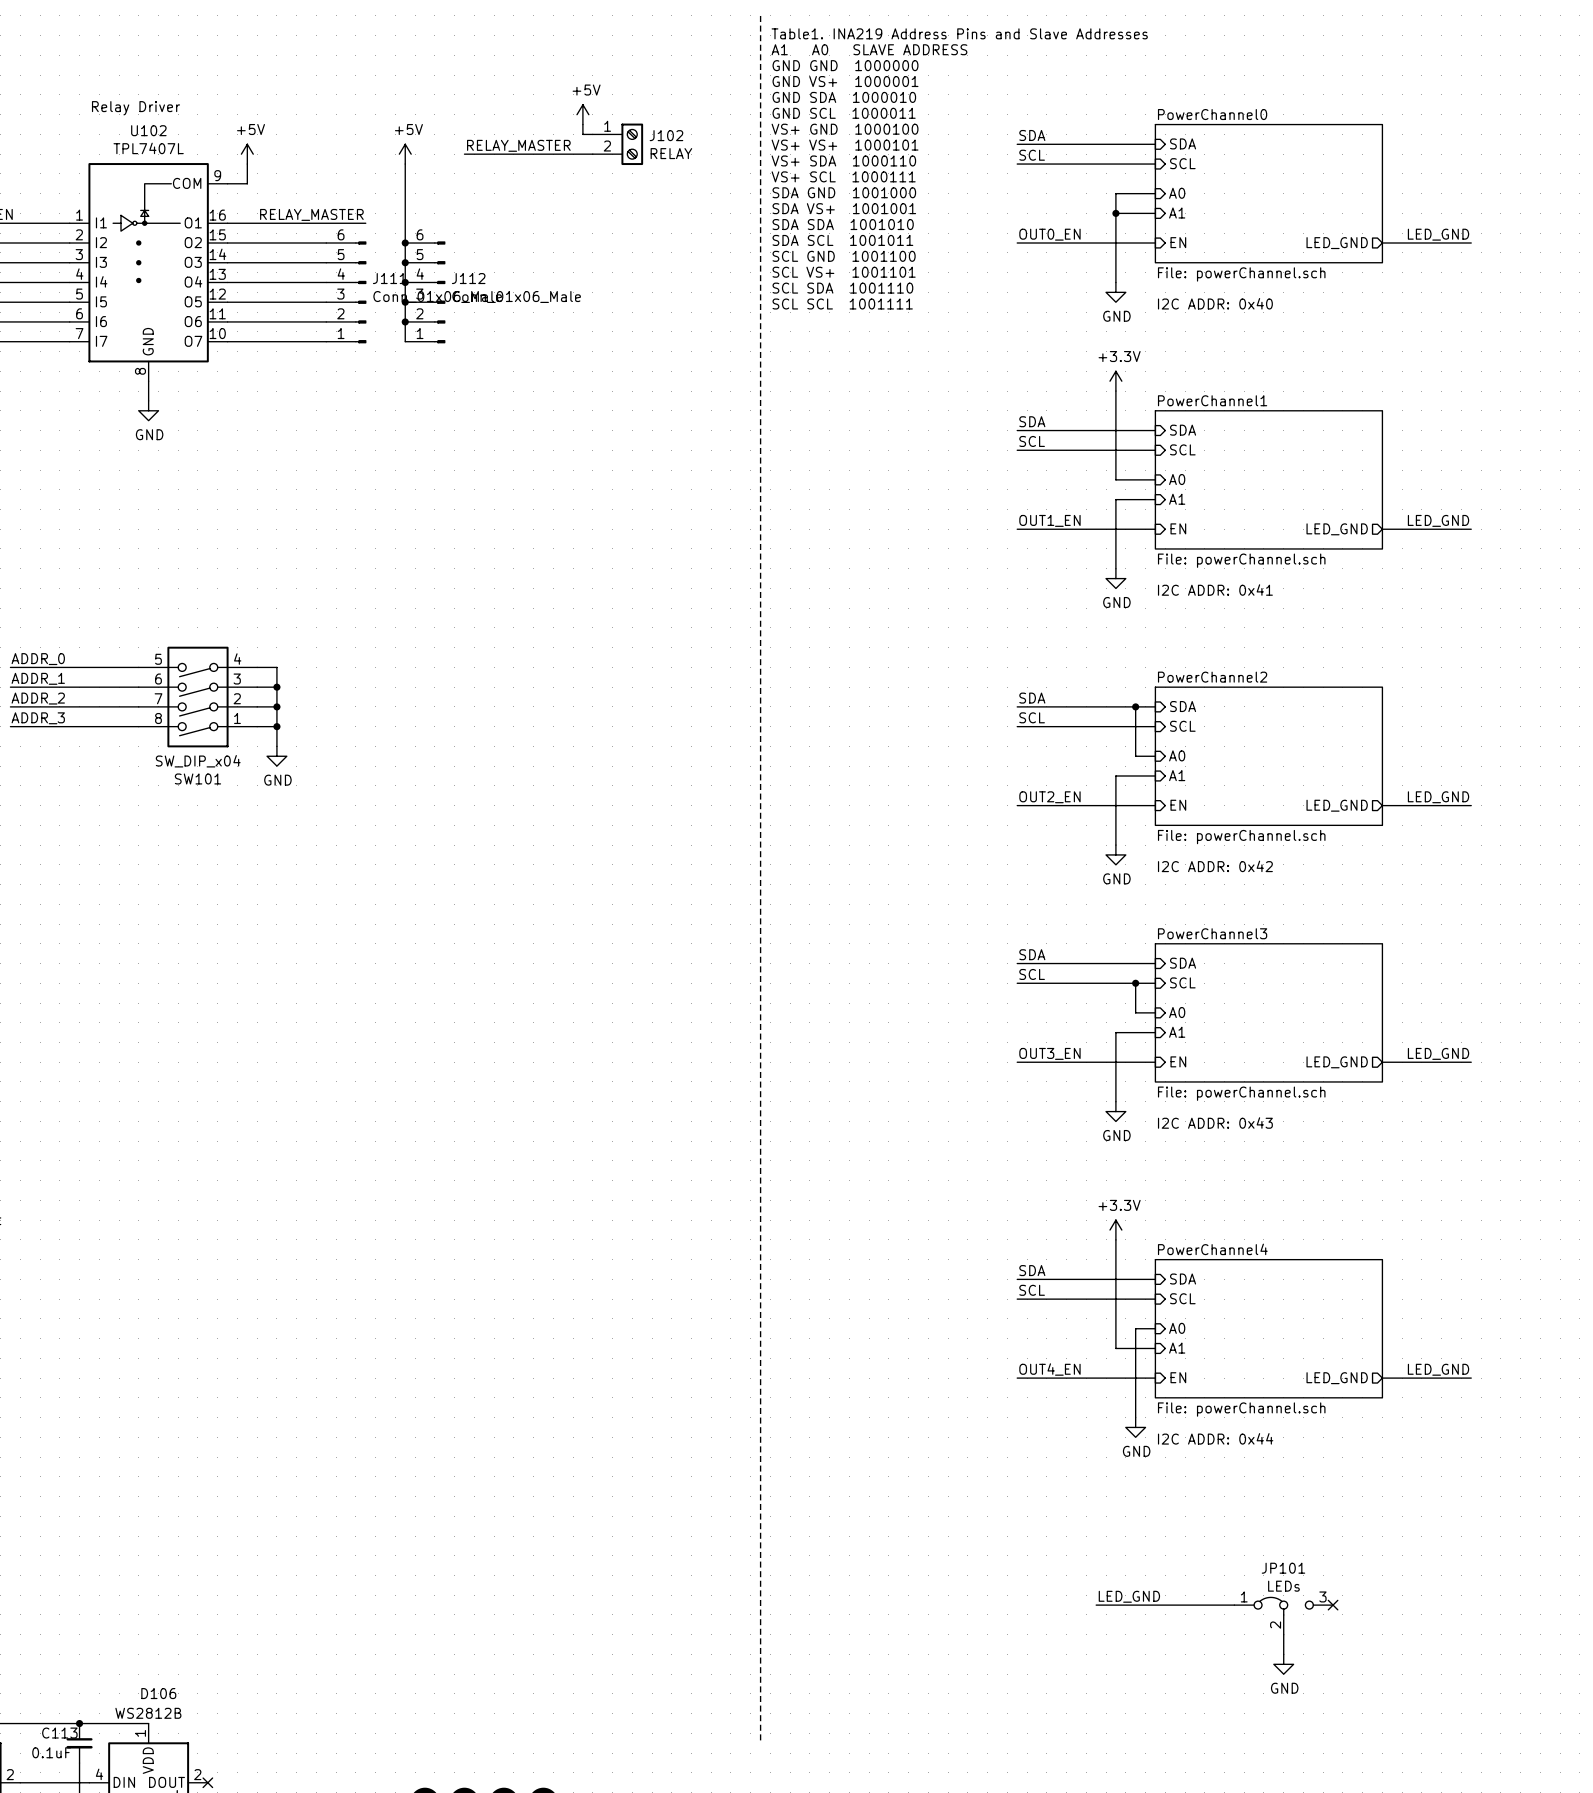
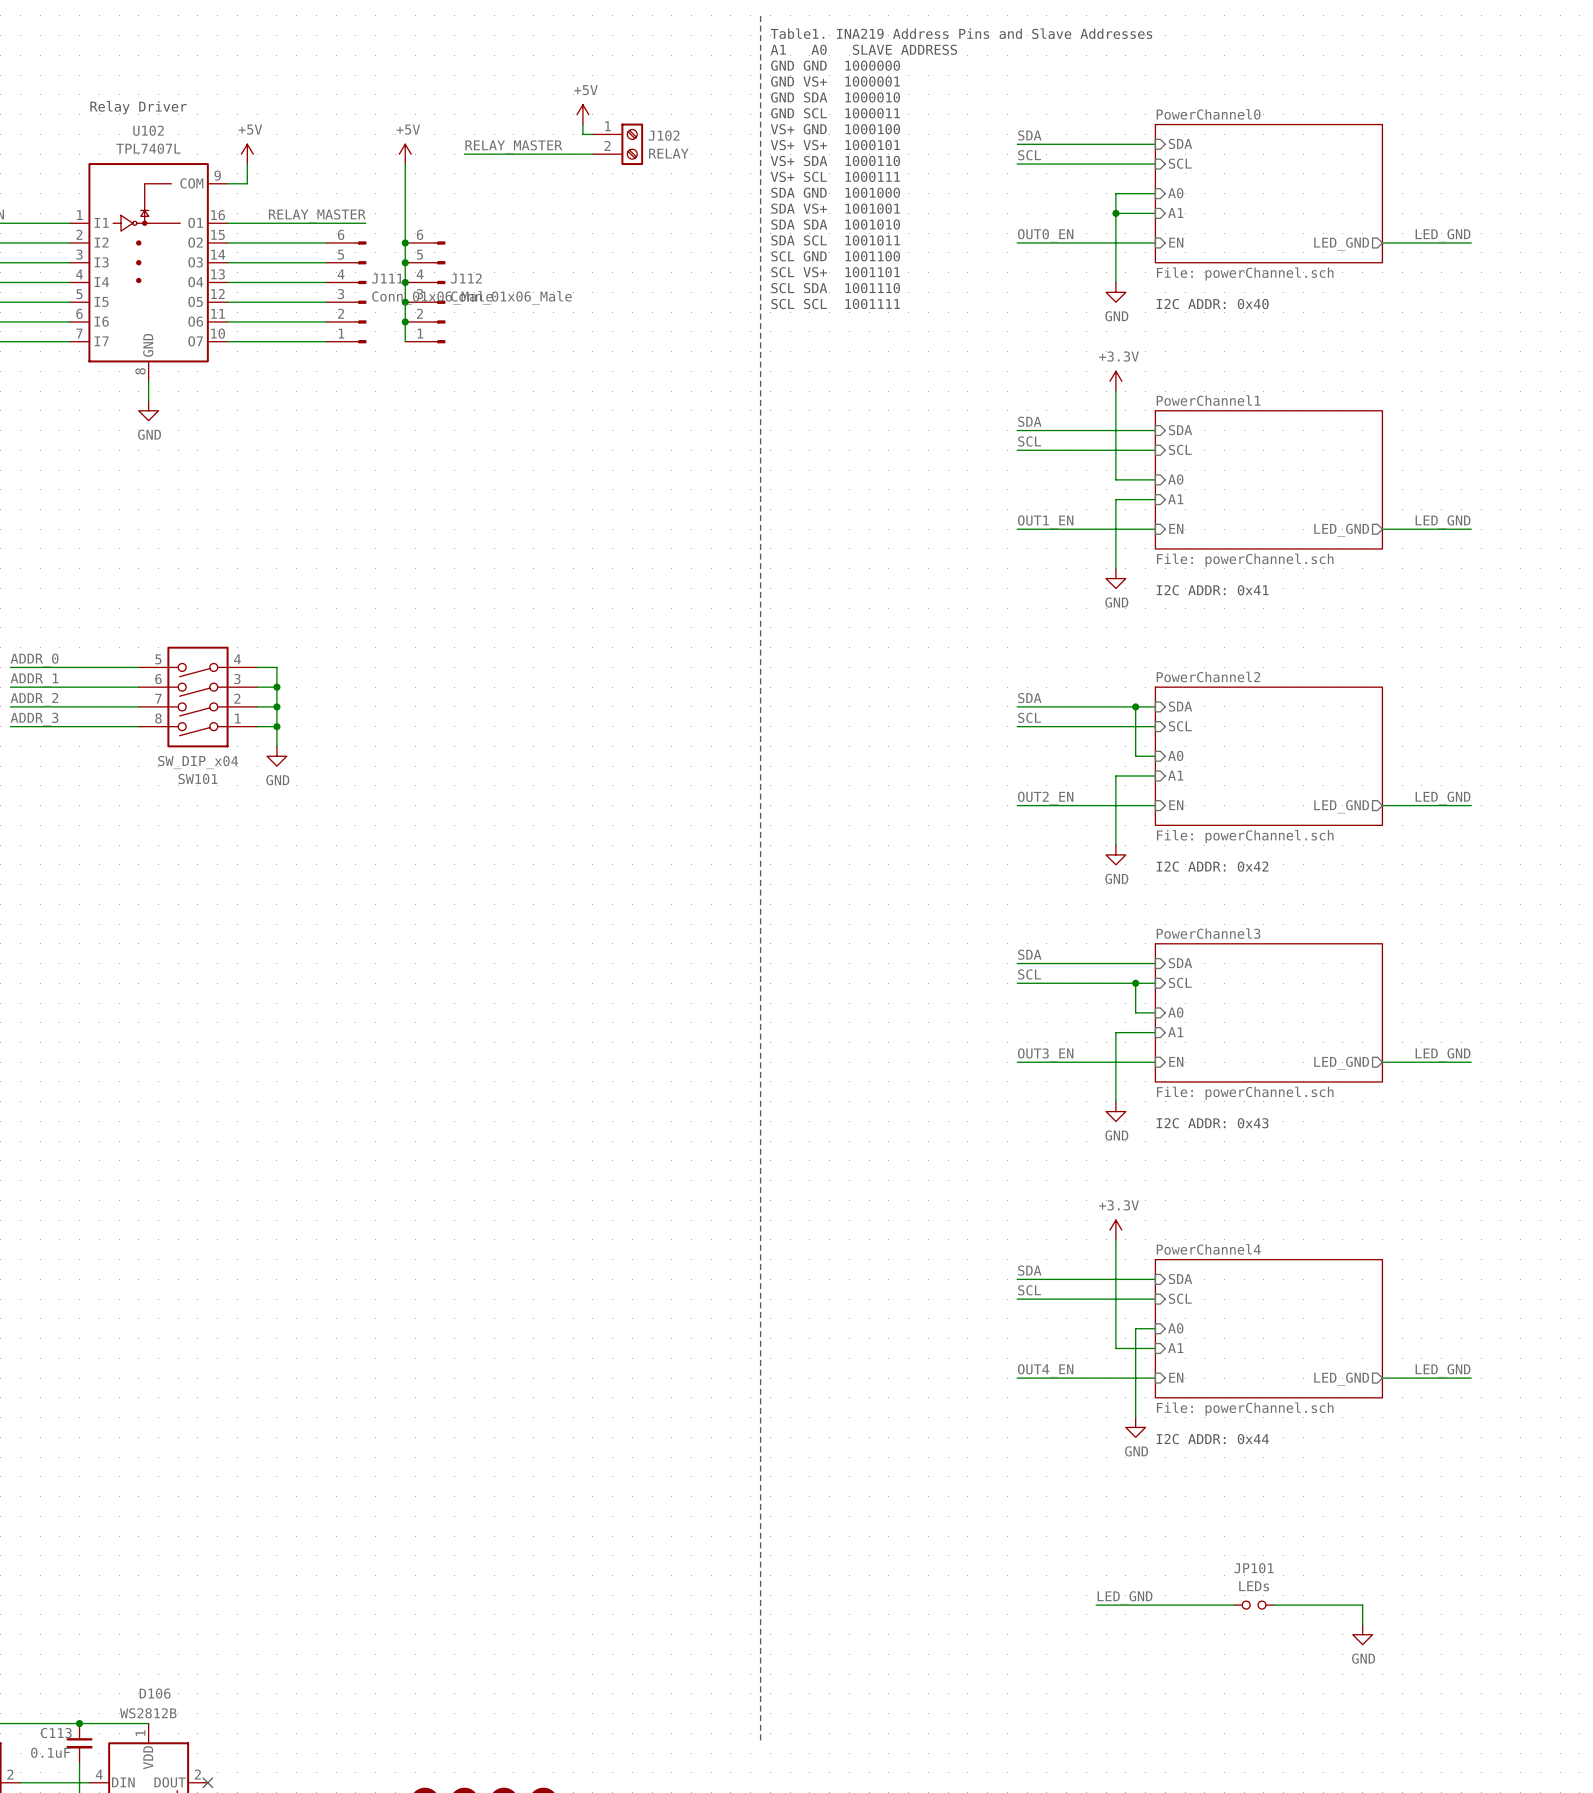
JP101 symbol: [1234, 1597, 1334, 1635] -> [1234, 1601, 1274, 1610]
wire: none -> (1273, 1605) (1362, 1605) (1362, 1624)
no-connect mark: (1333, 1605) -> none
wire: (1283, 1634) (1283, 1654) -> none
power symbol position: GND (1283, 1664) -> GND (1362, 1634)

